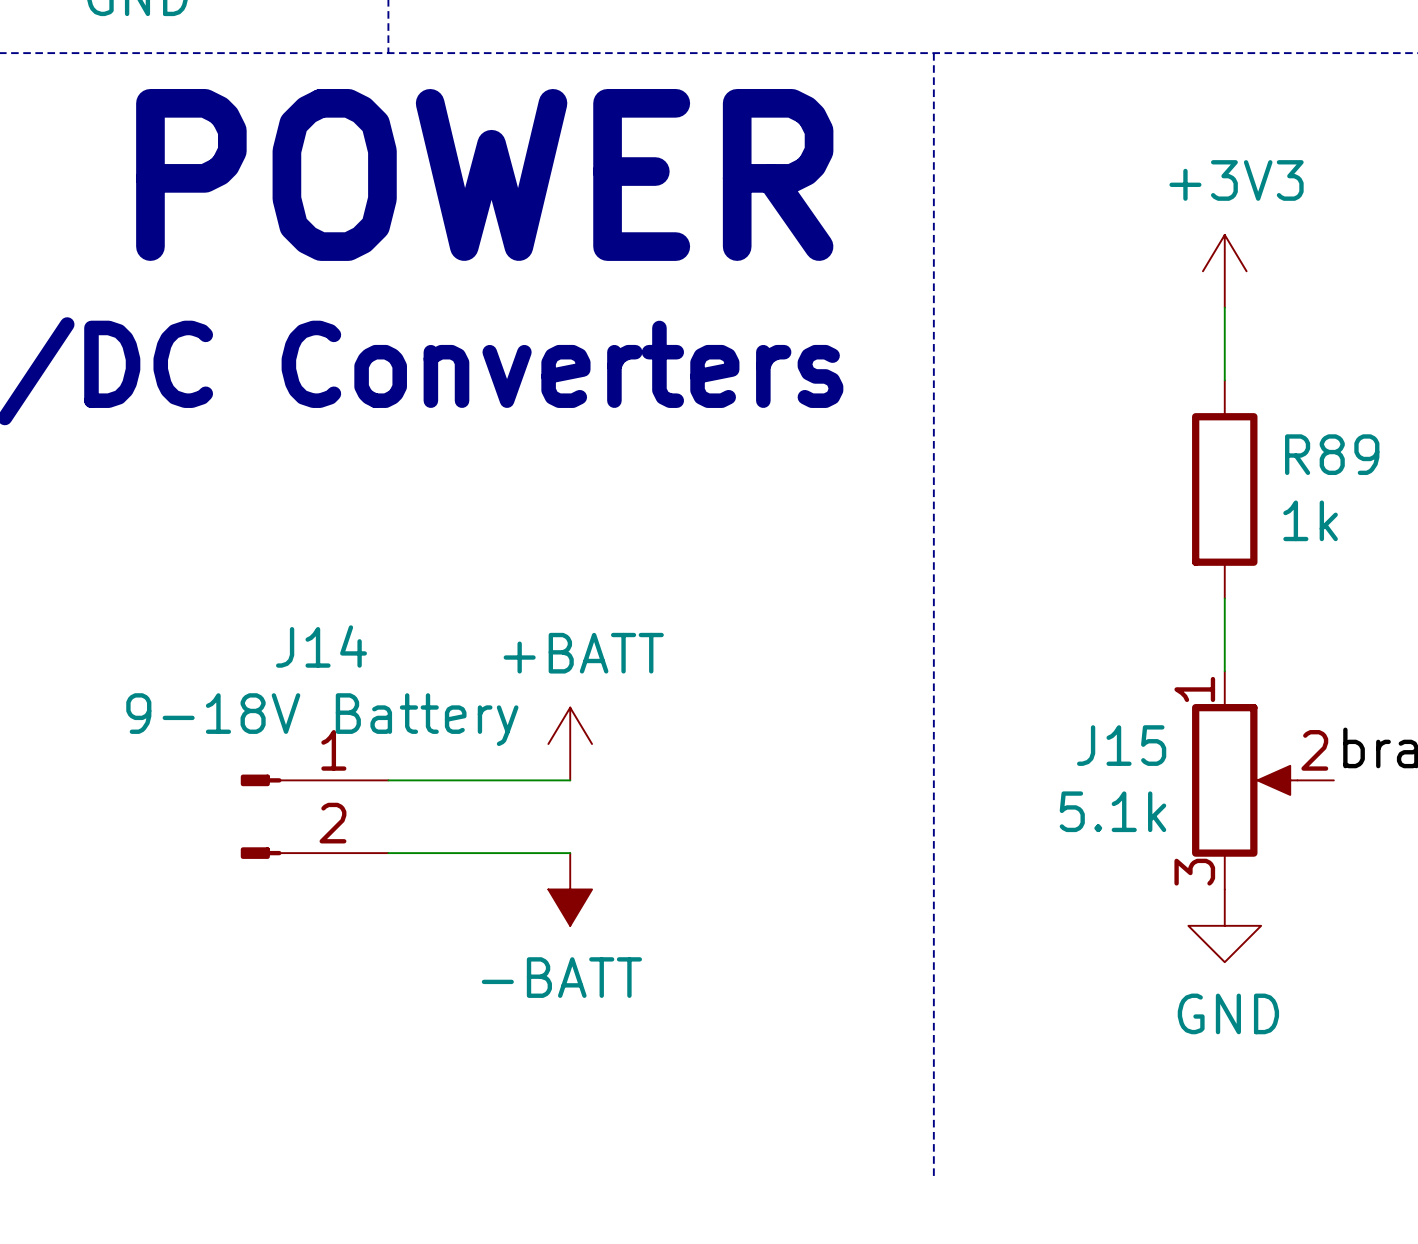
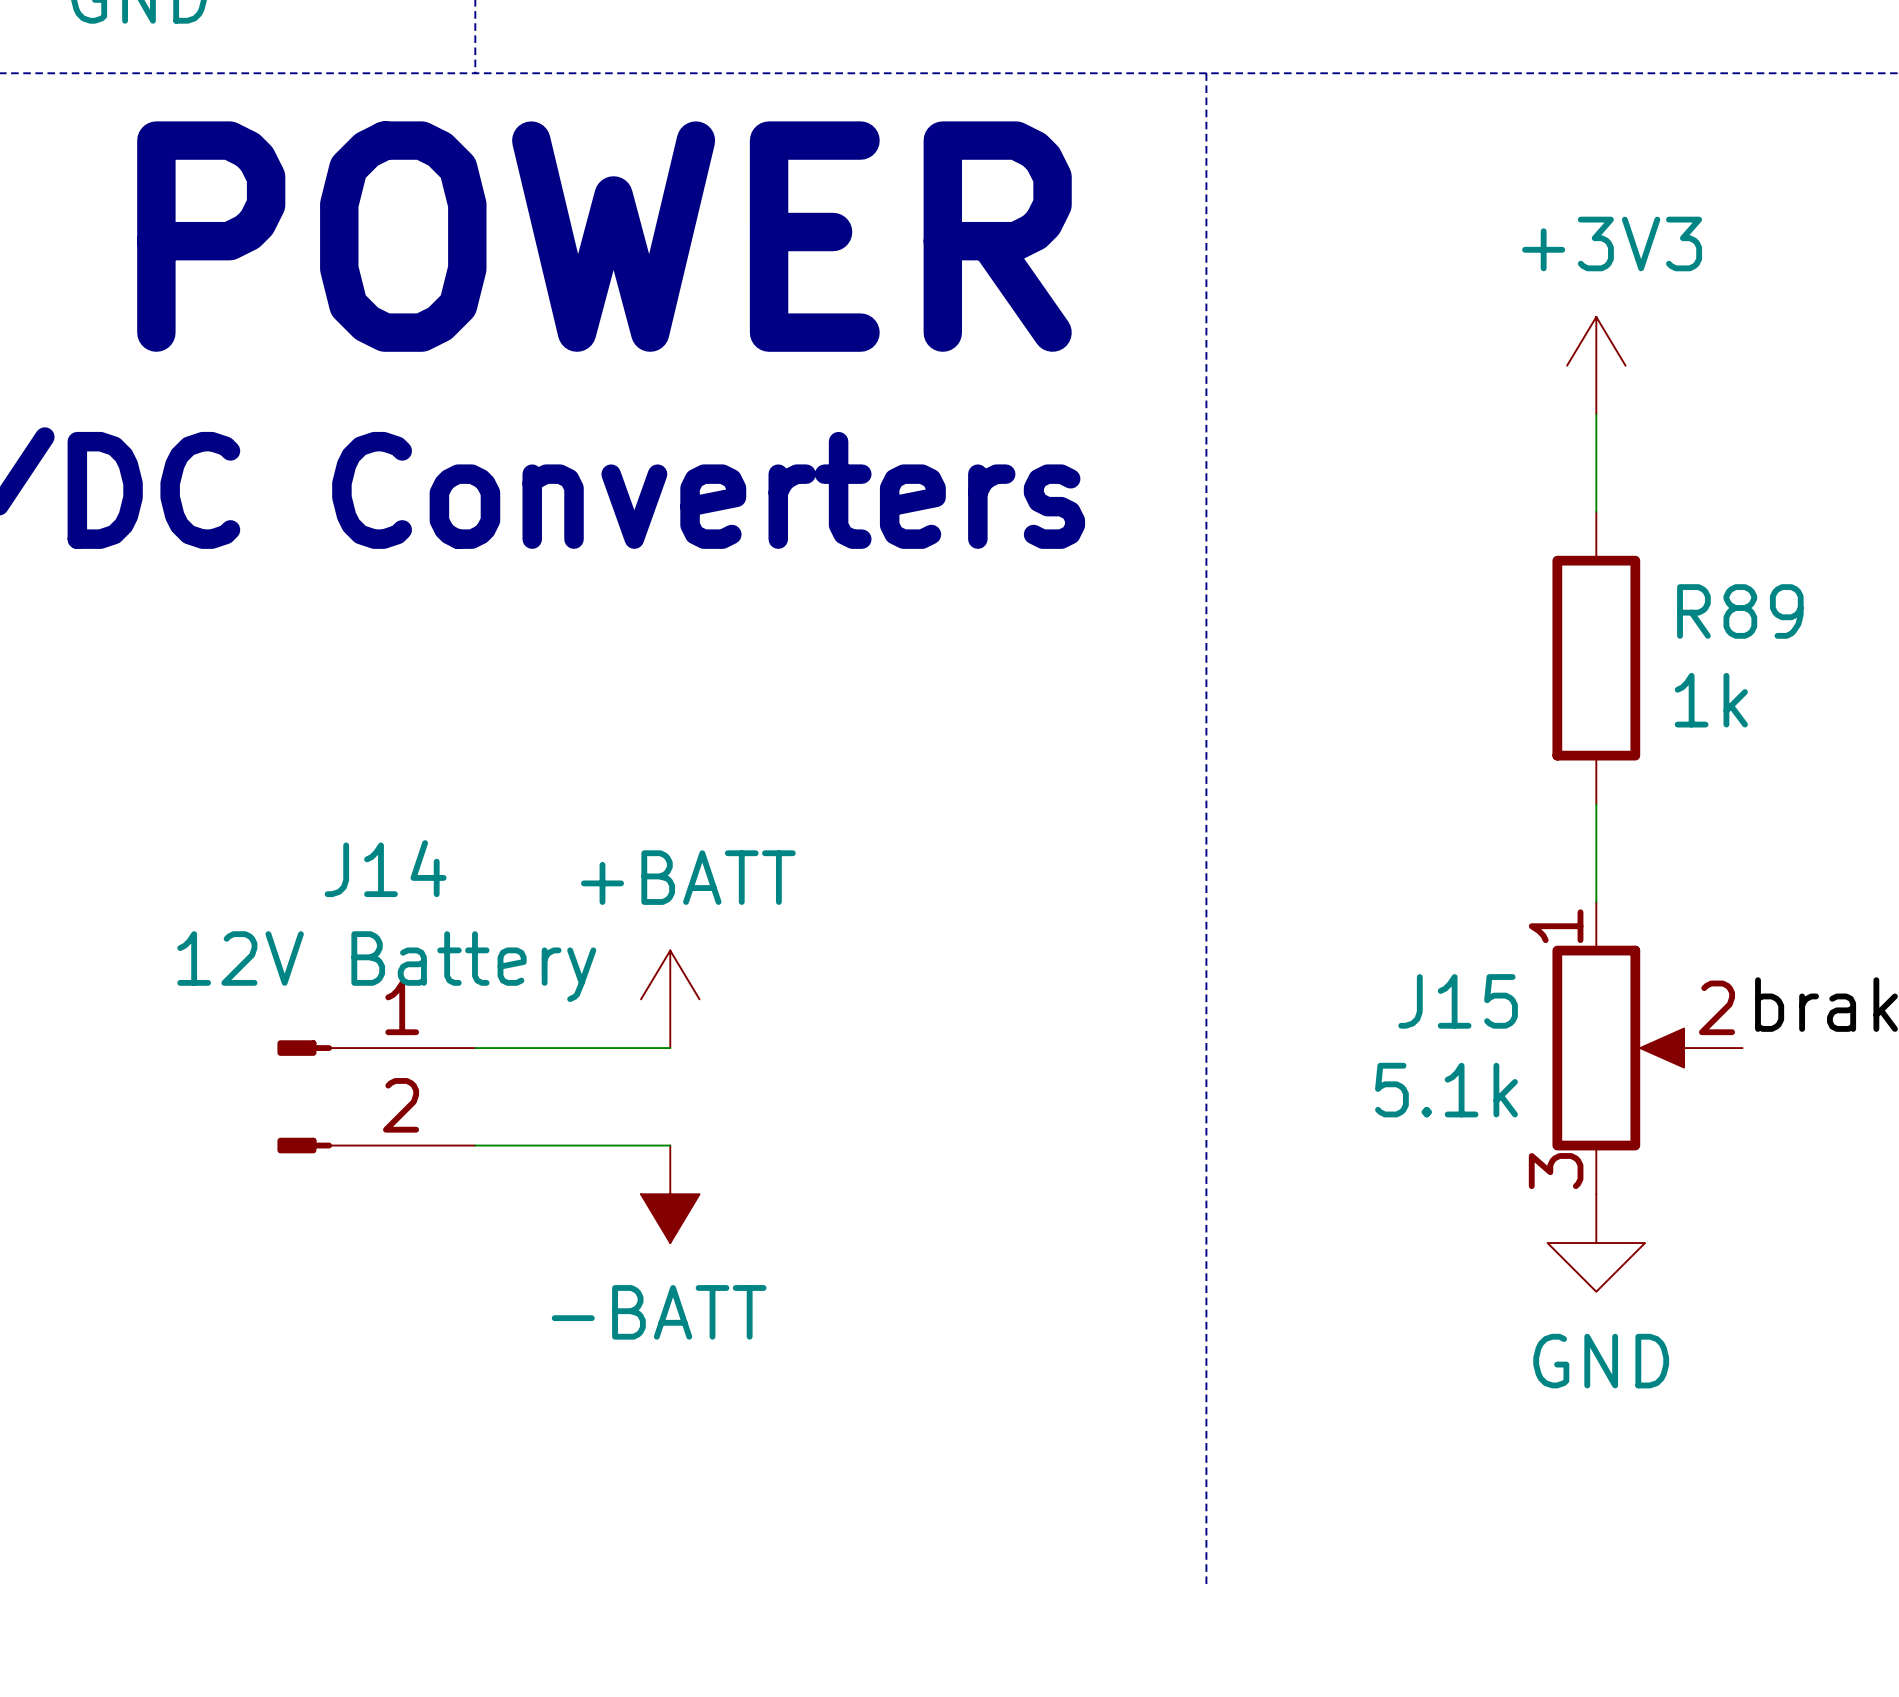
J14 value: 9-18V Battery (322, 719) -> 12V Battery (386, 966)
power symbol position: +BATT (570, 744) -> +BATT (670, 999)
wire: (533, 780) (570, 780) -> none
wire: (533, 853) (570, 853) -> none
power symbol position: -BATT (570, 889) -> -BATT (670, 1194)

